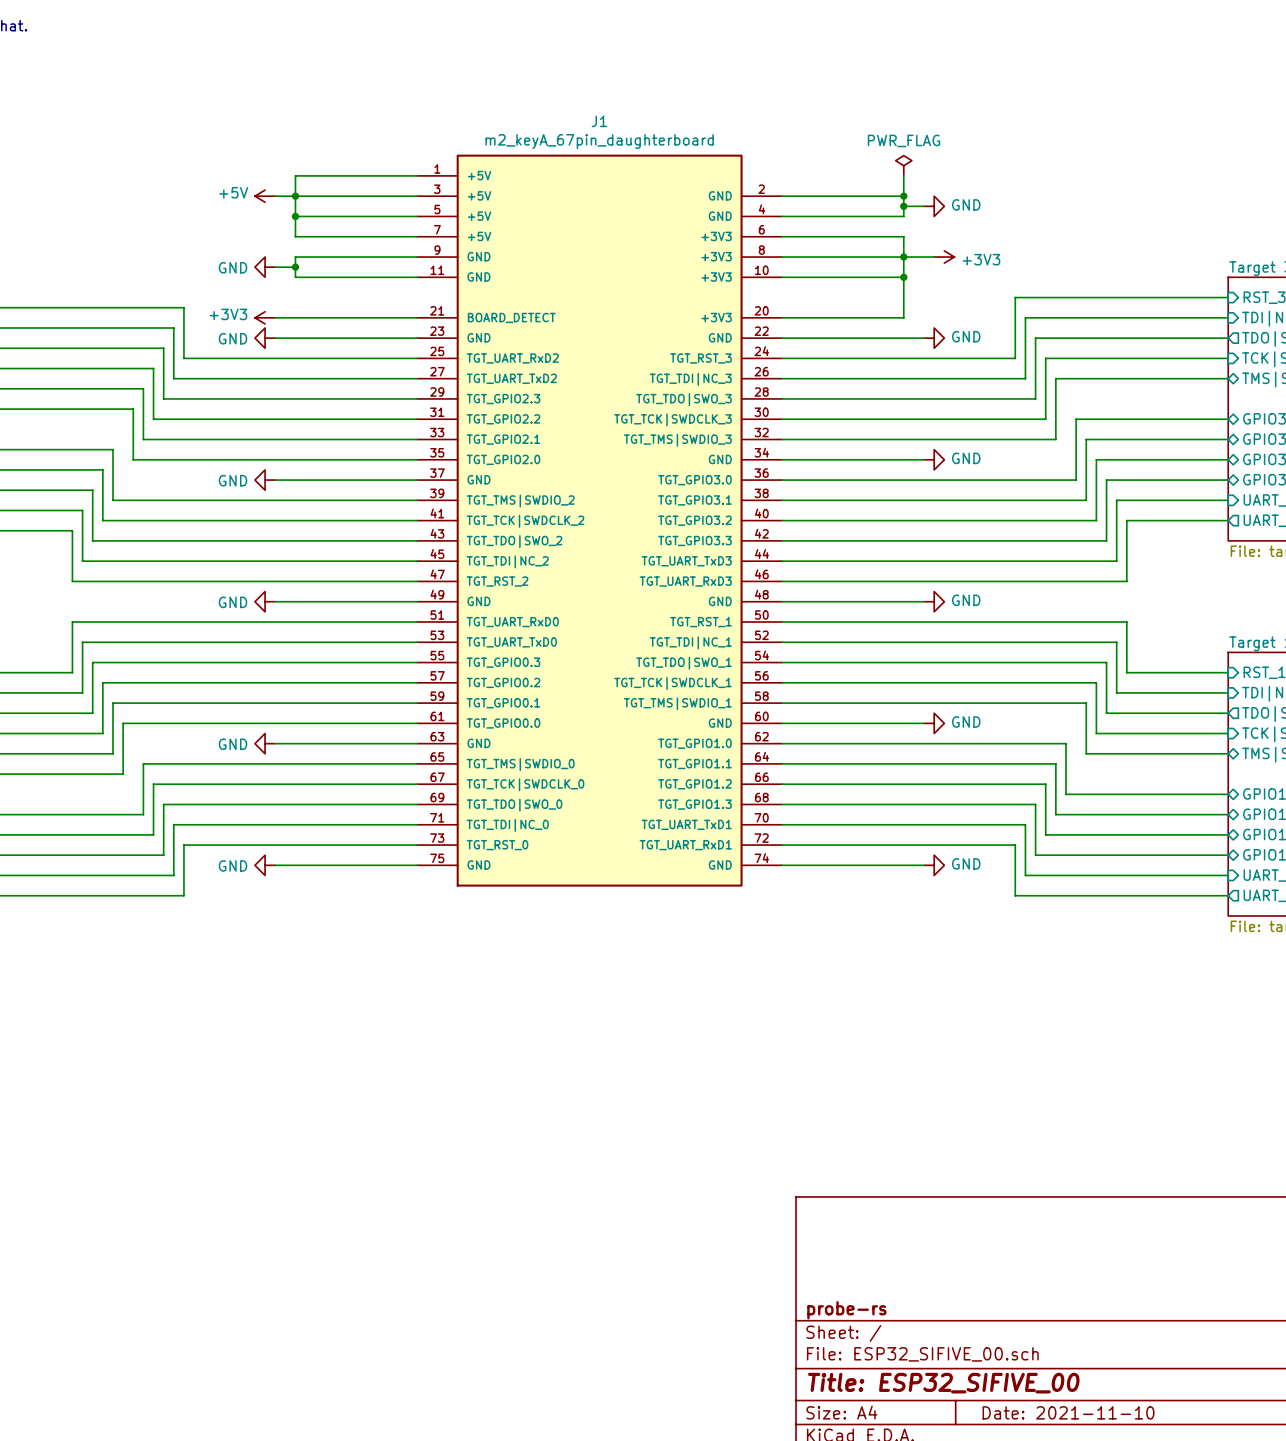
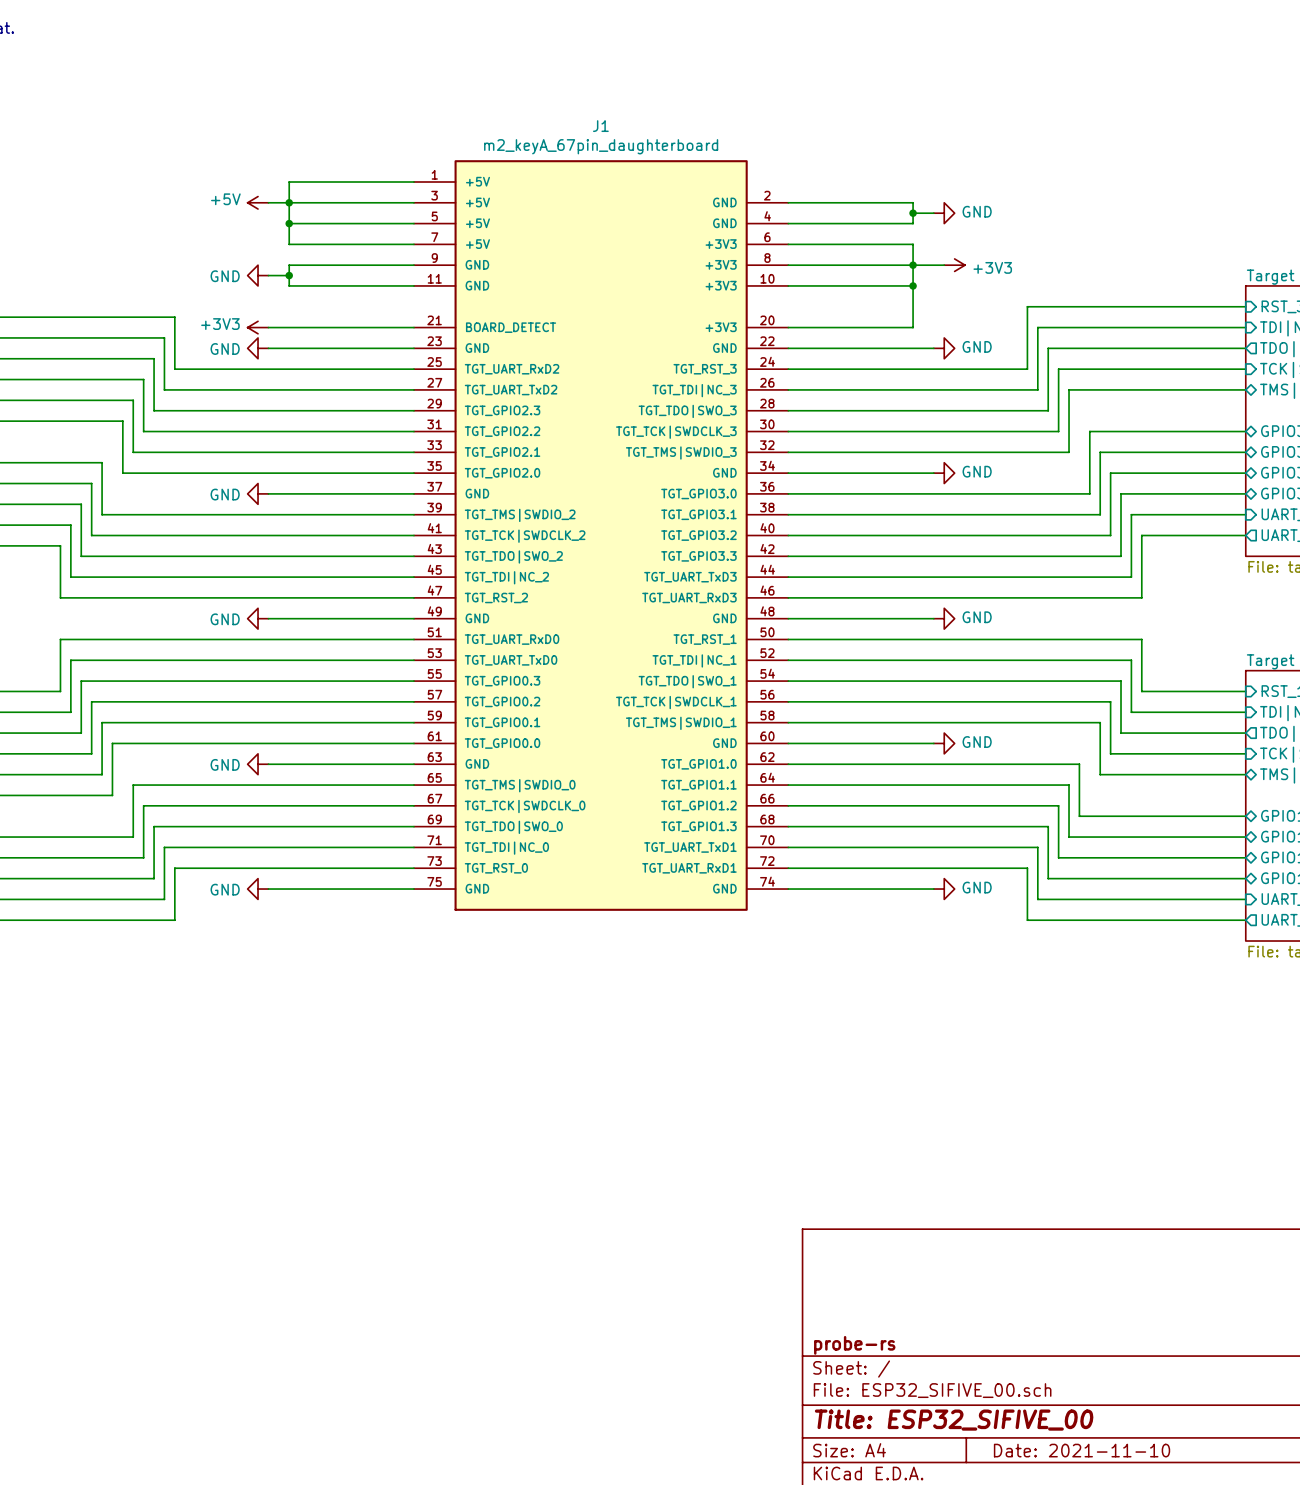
power symbol: PWR_FLAG (903, 165) -> none
wire: (903, 175) (903, 196) -> none
junction: (903, 196) -> none

